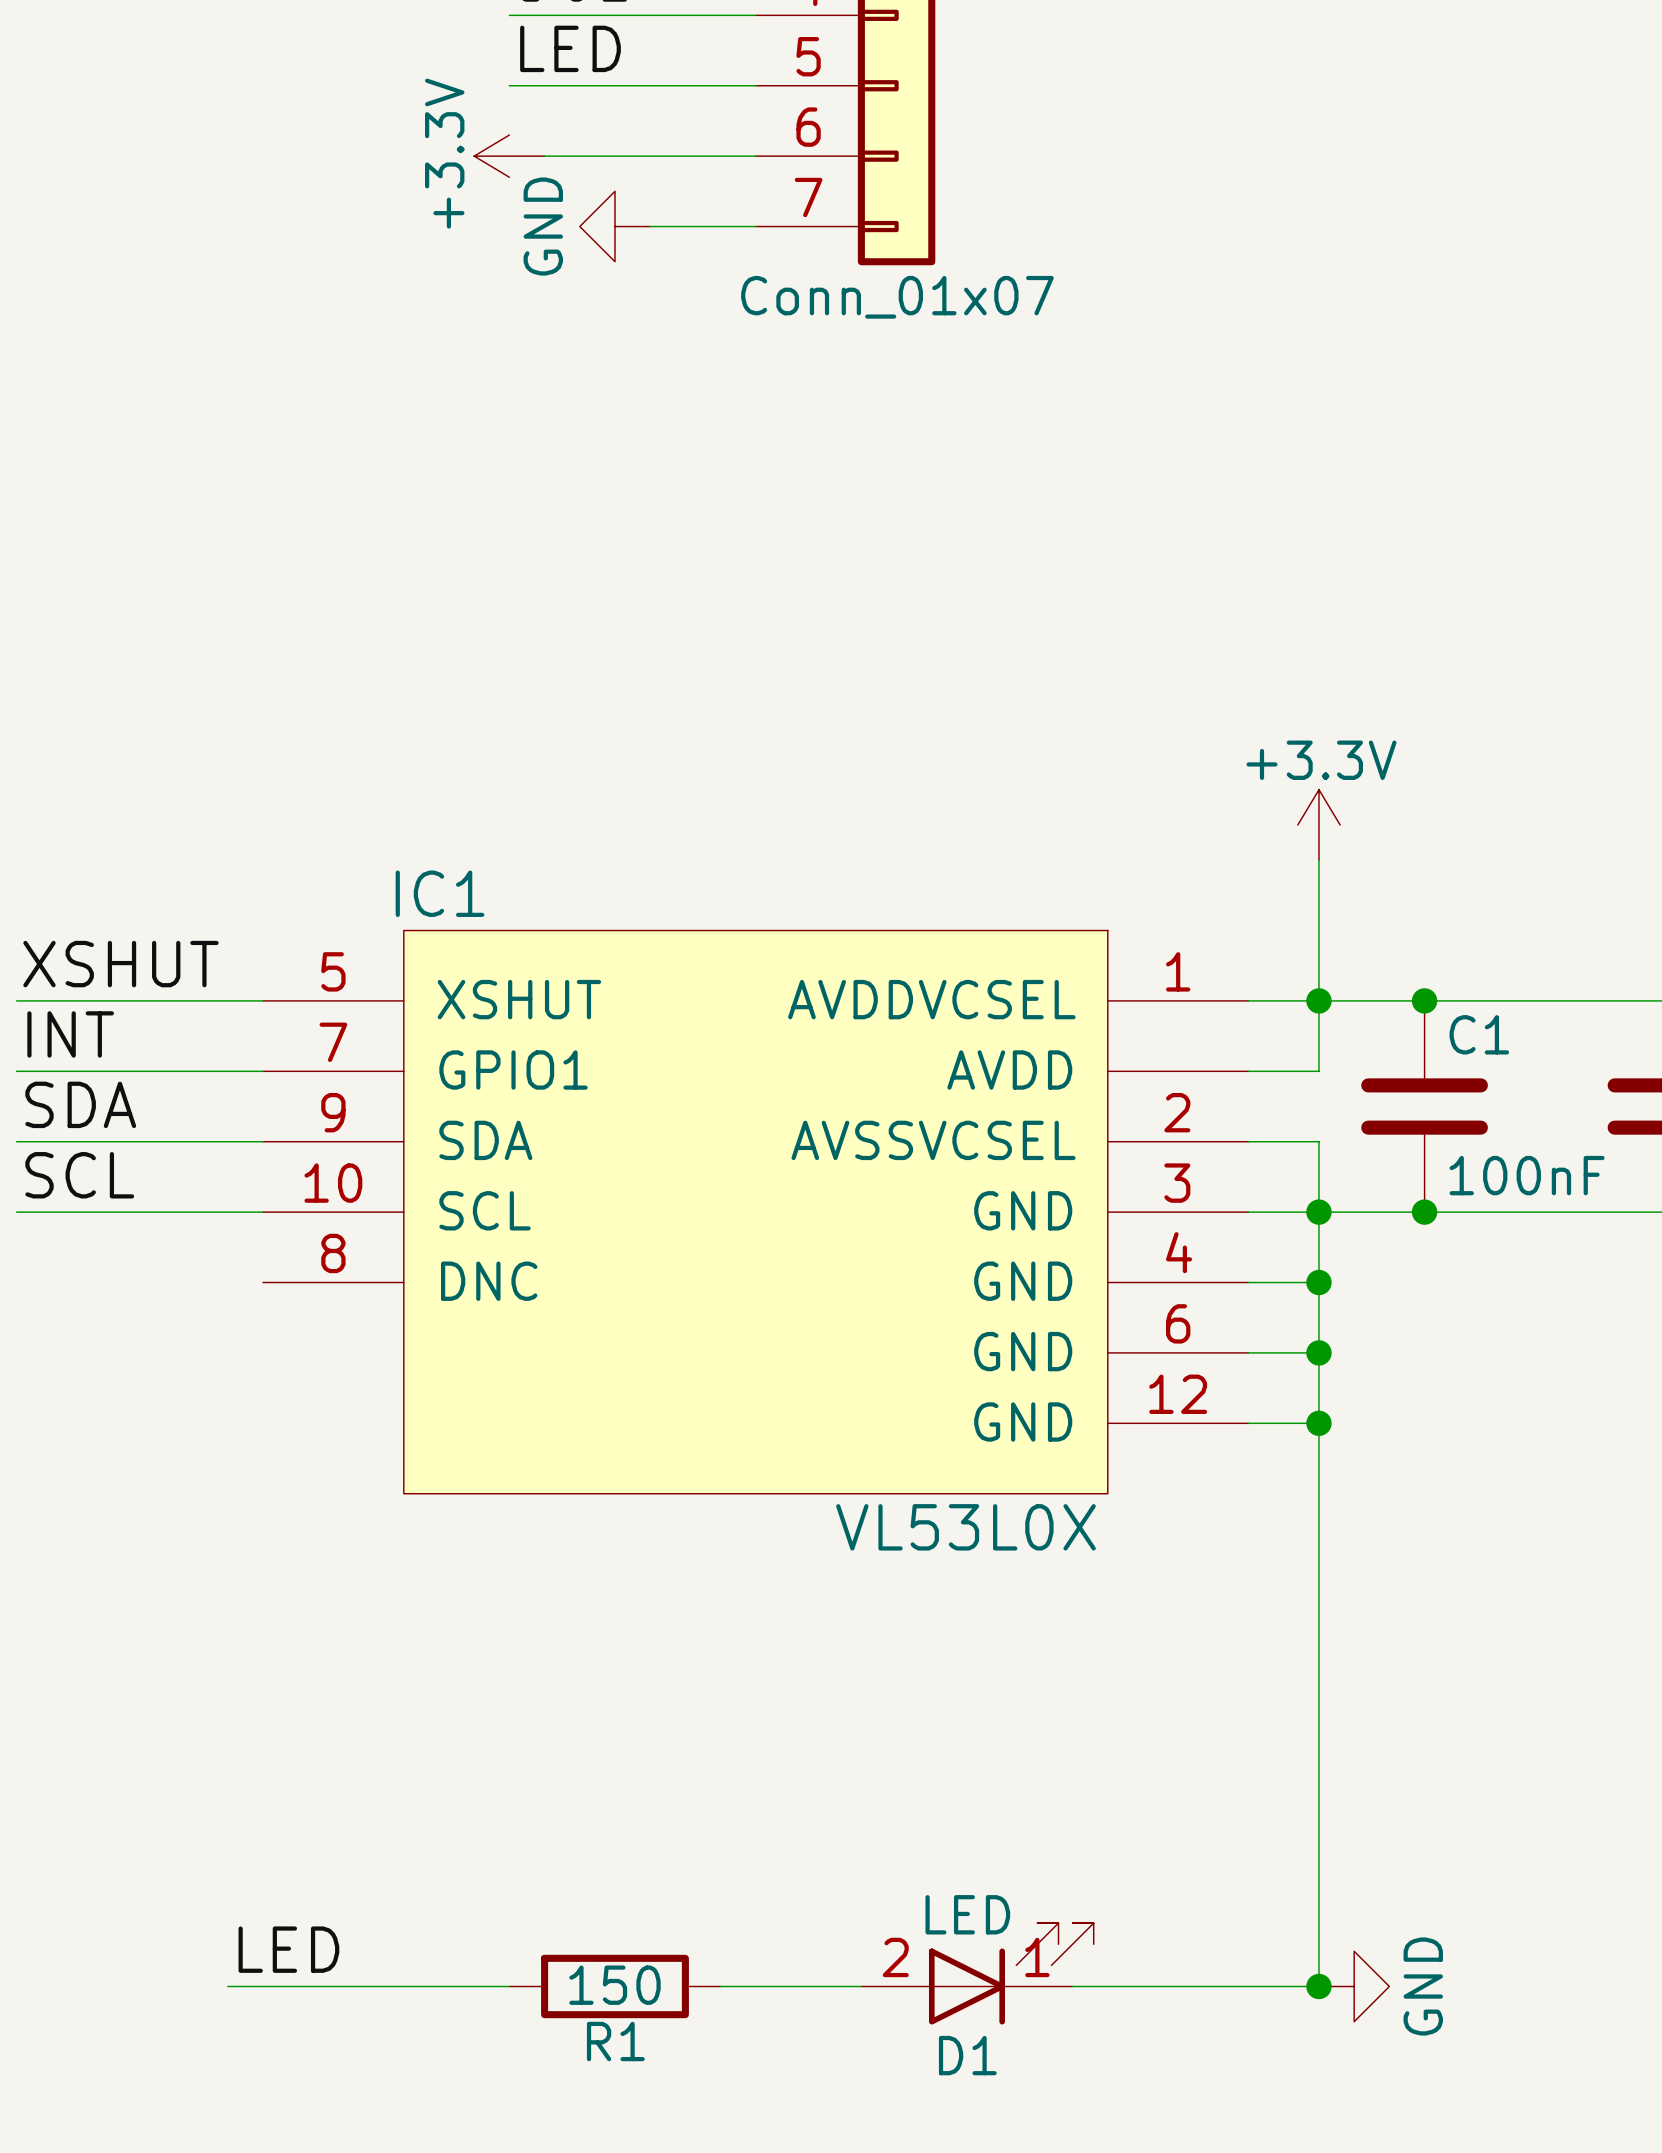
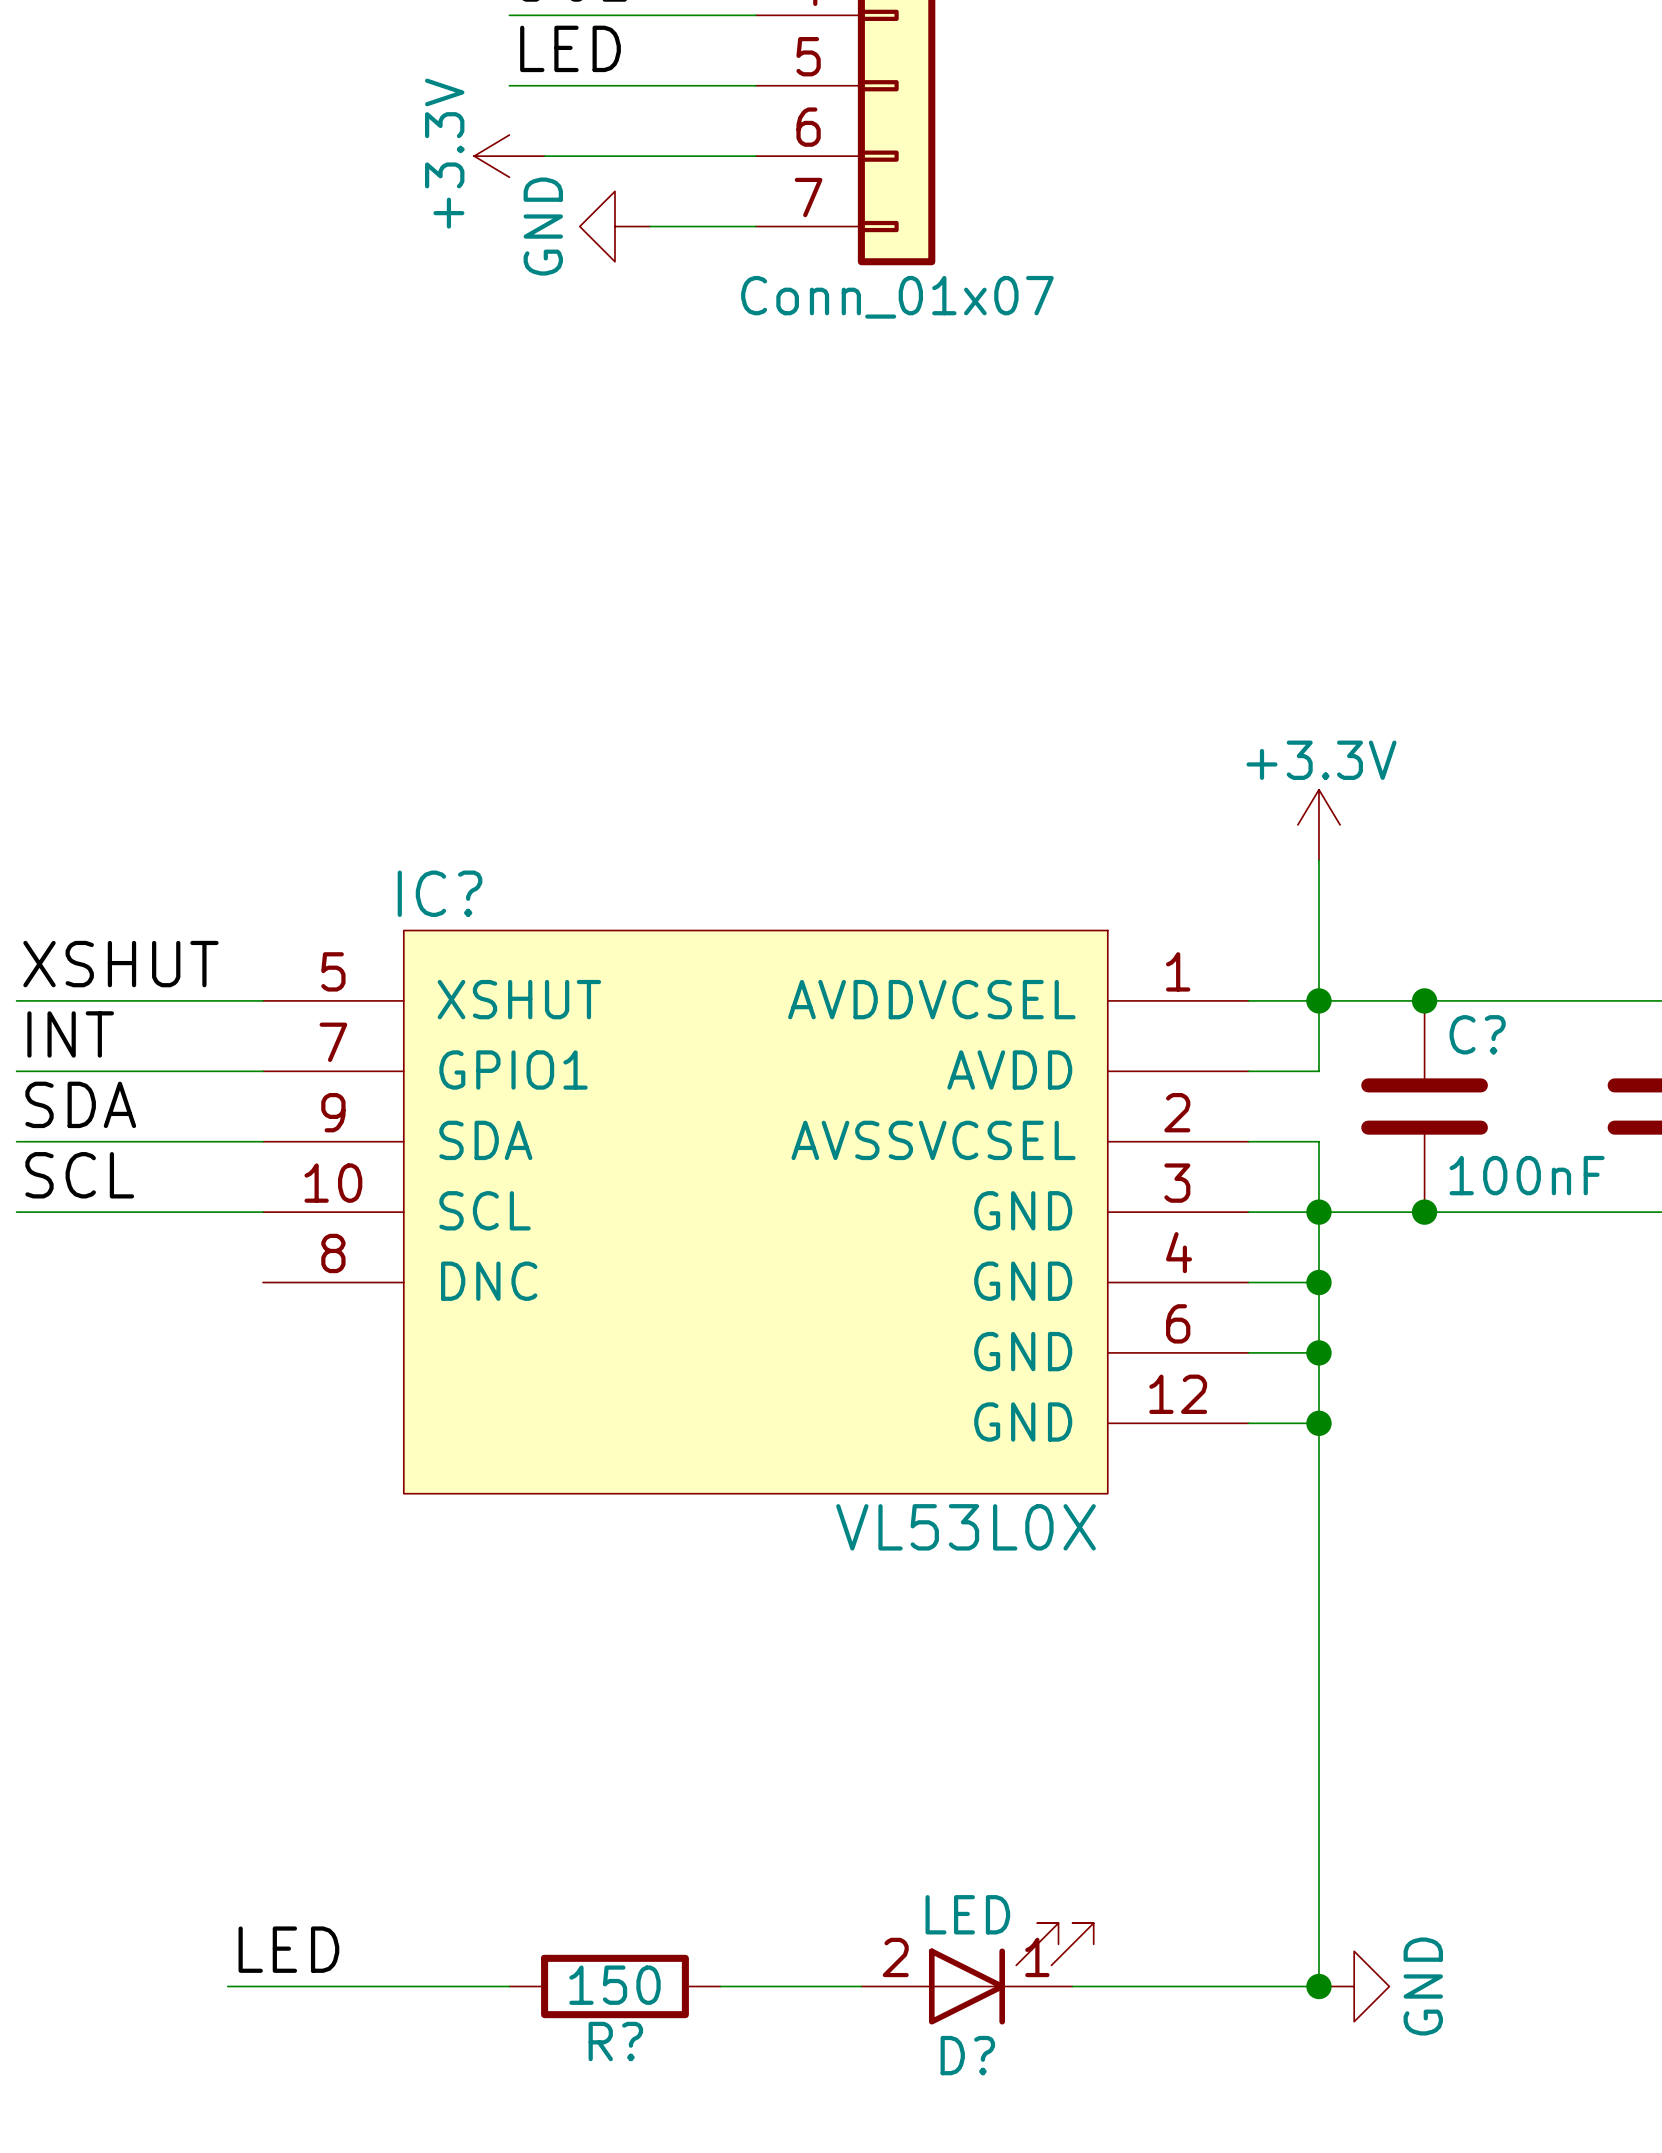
IC1 name: IC1 (440, 893) -> IC? (440, 893)
C1 name: C1 (1479, 1034) -> C? (1477, 1034)
R1 name: R1 (615, 2041) -> R? (615, 2041)
D1 name: D1 (967, 2055) -> D? (967, 2055)

